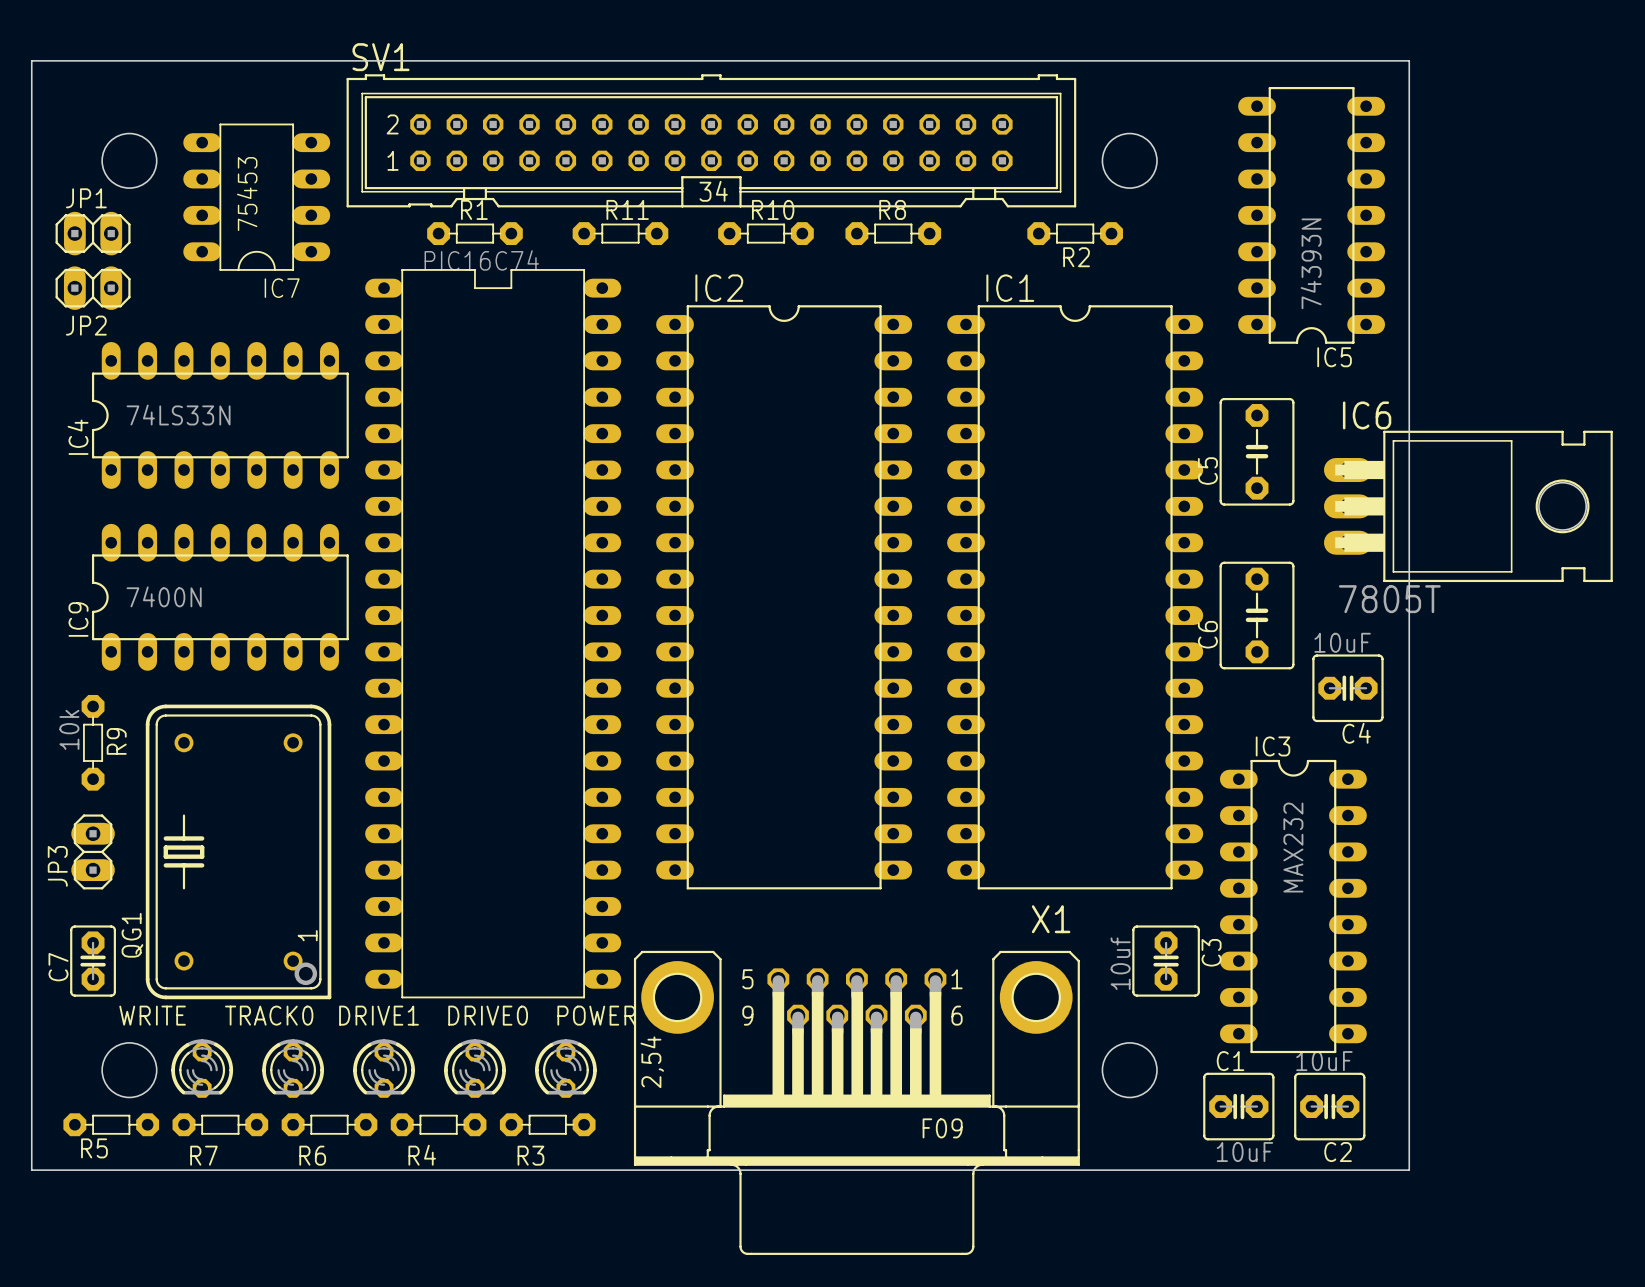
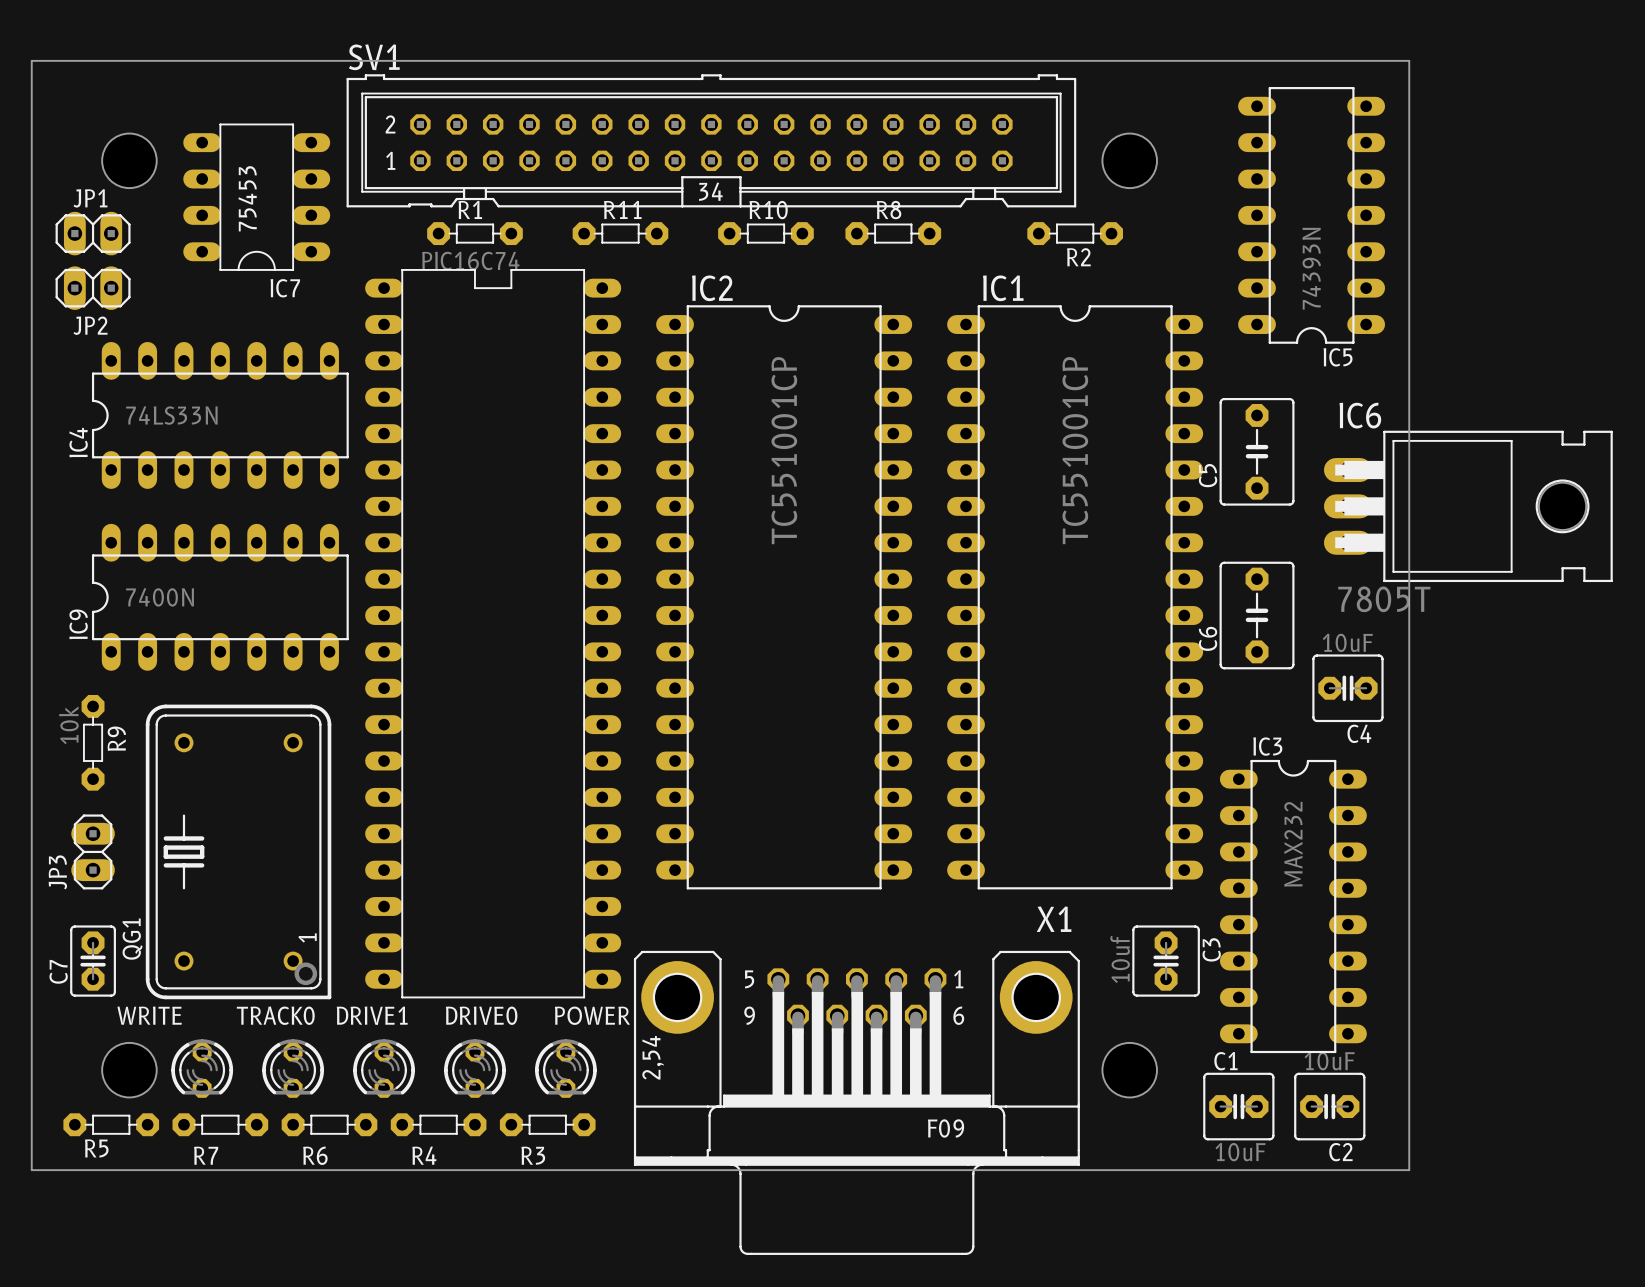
IC2 value: none -> TC551001CP (784, 450)
IC1 value: none -> TC551001CP (1075, 450)

